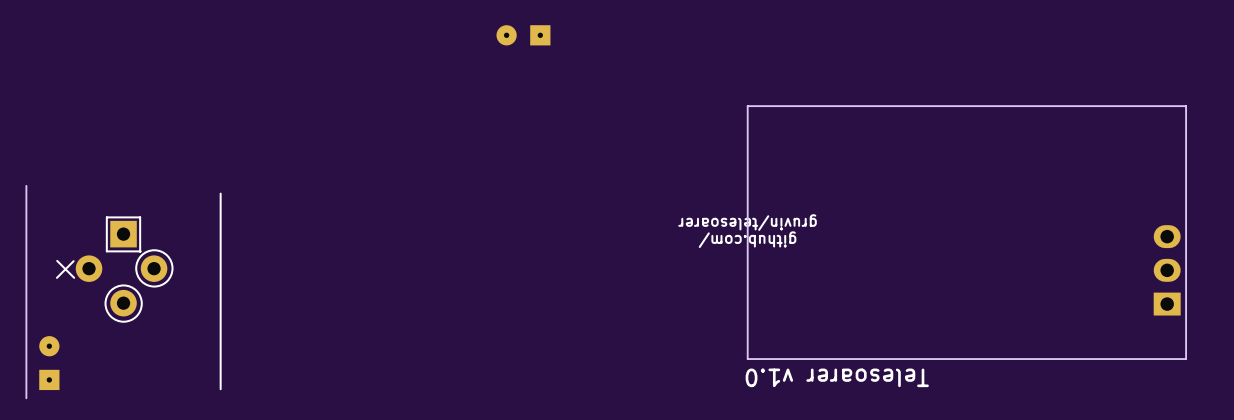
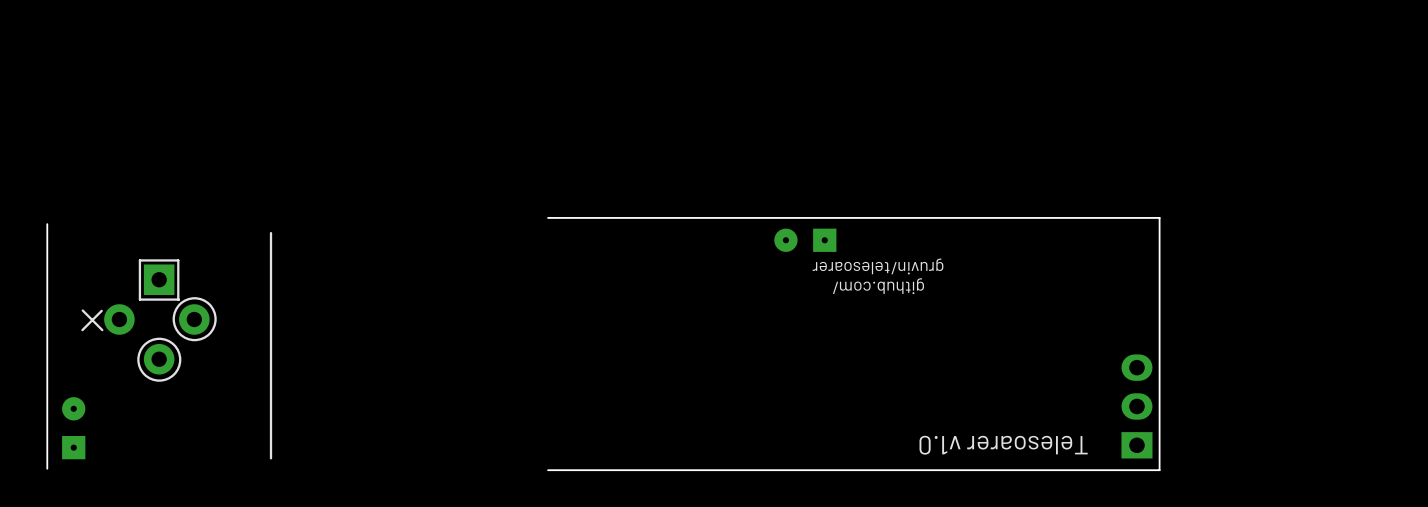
part position: (523, 35) -> (805, 240)
board edge: (1186, 106) (1186, 359) (747, 359) (747, 106) (1186, 106) -> none
board edge: none -> (548, 217) (1159, 217) (1159, 470) (548, 470)
part position: (1167, 270) -> (1136, 406)

